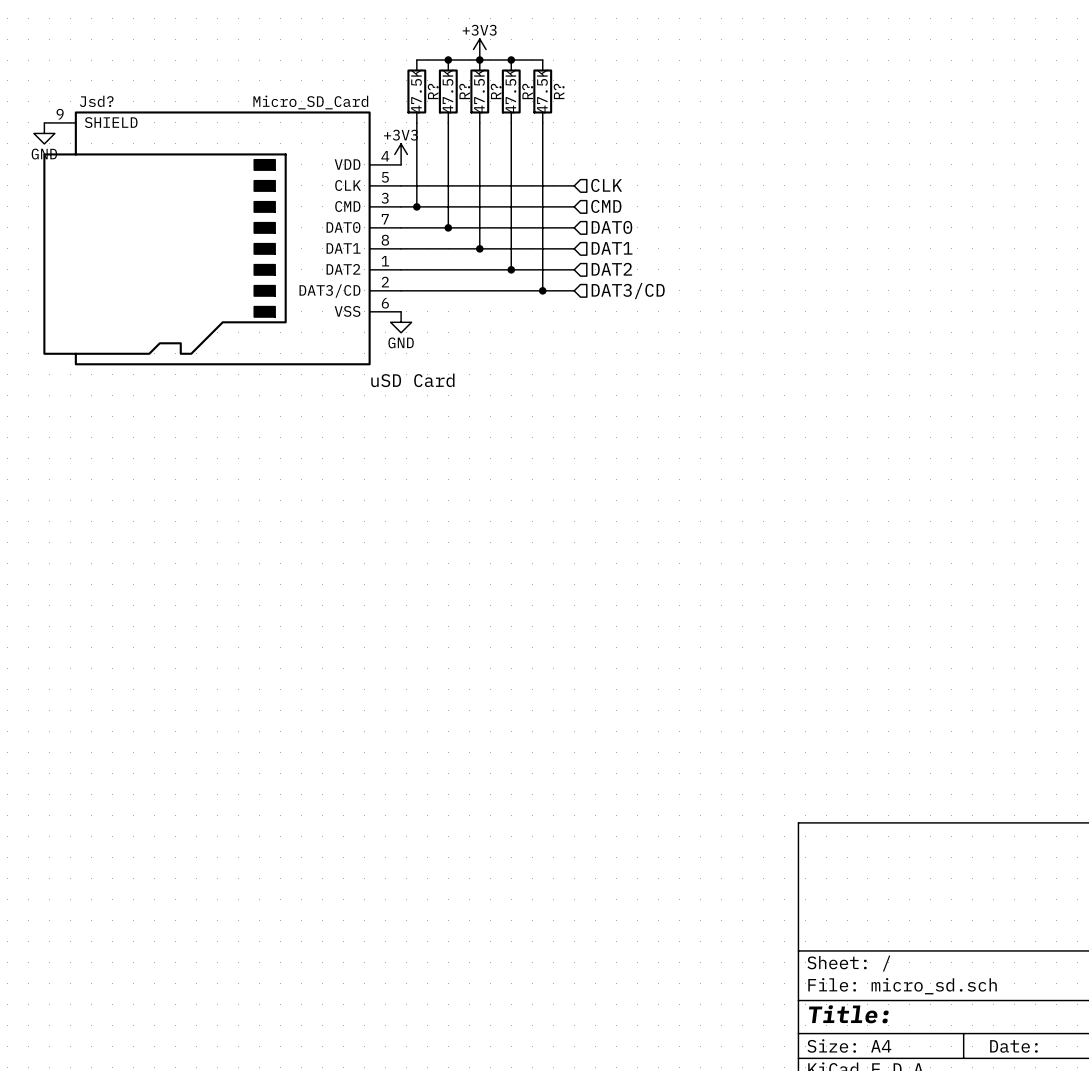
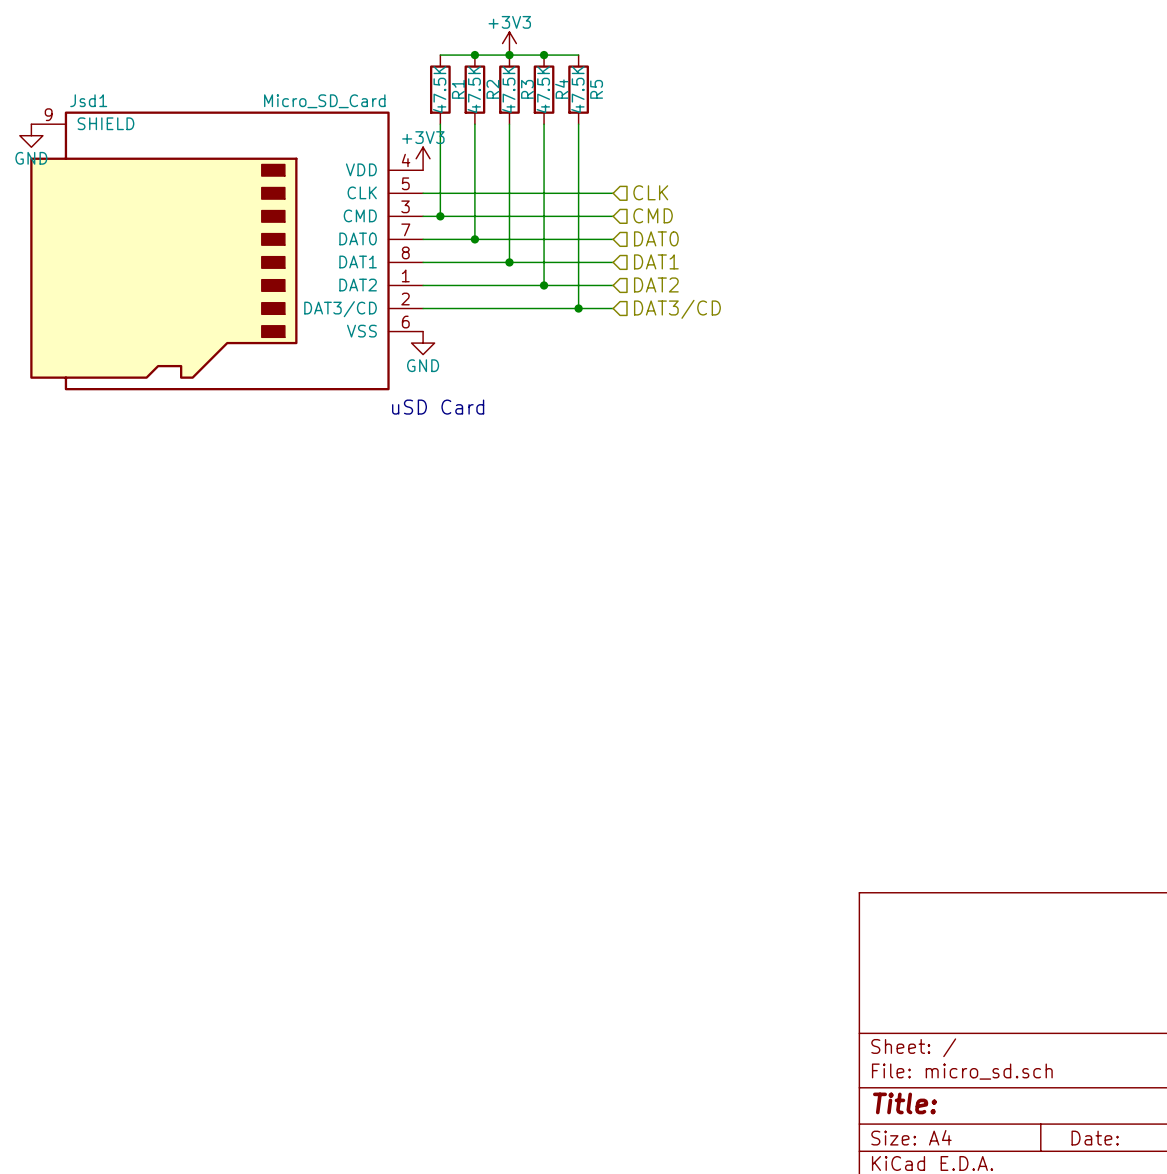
R? name: R? (433, 91) -> R1 (458, 89)
R? name: R? (464, 91) -> R2 (492, 89)
R? name: R? (496, 91) -> R3 (527, 89)
R? name: R? (527, 91) -> R4 (561, 89)
R? name: R? (559, 91) -> R5 (596, 89)
Jsd? name: Jsd? (96, 101) -> Jsd1 (88, 100)

